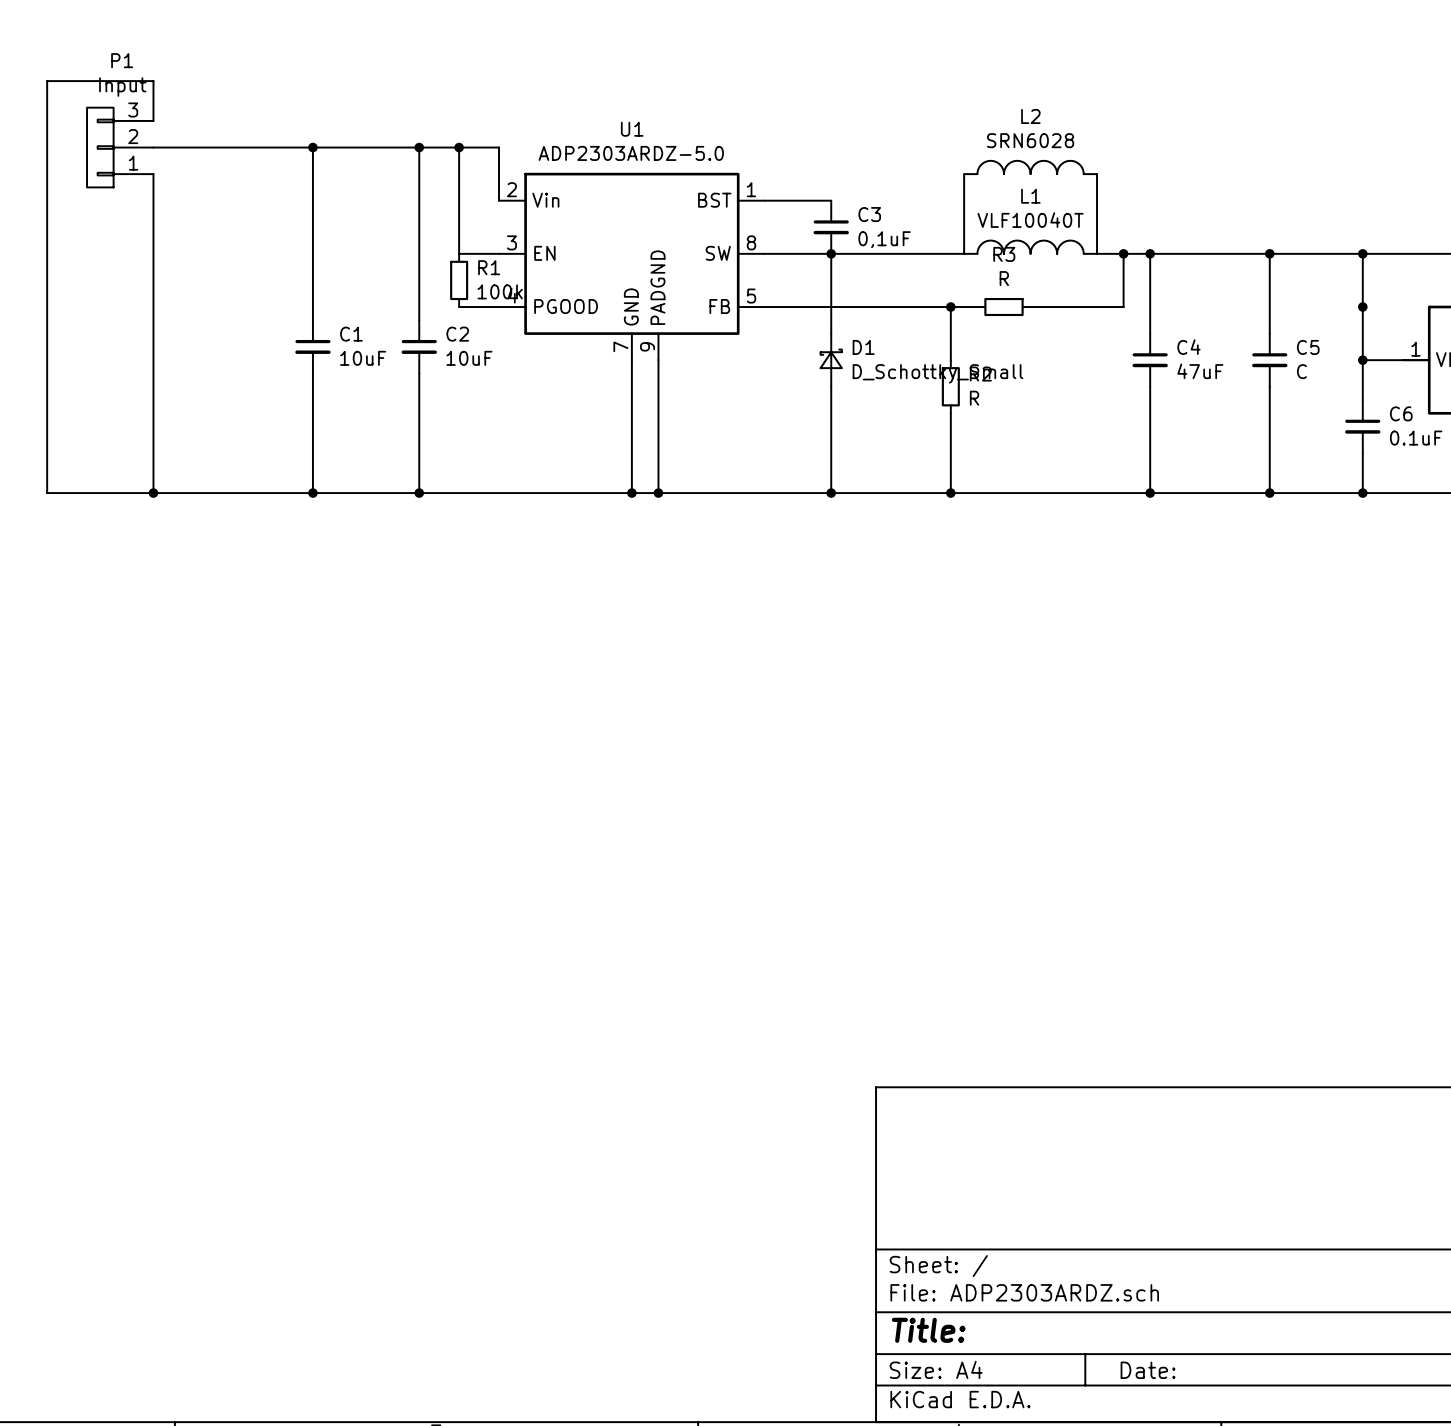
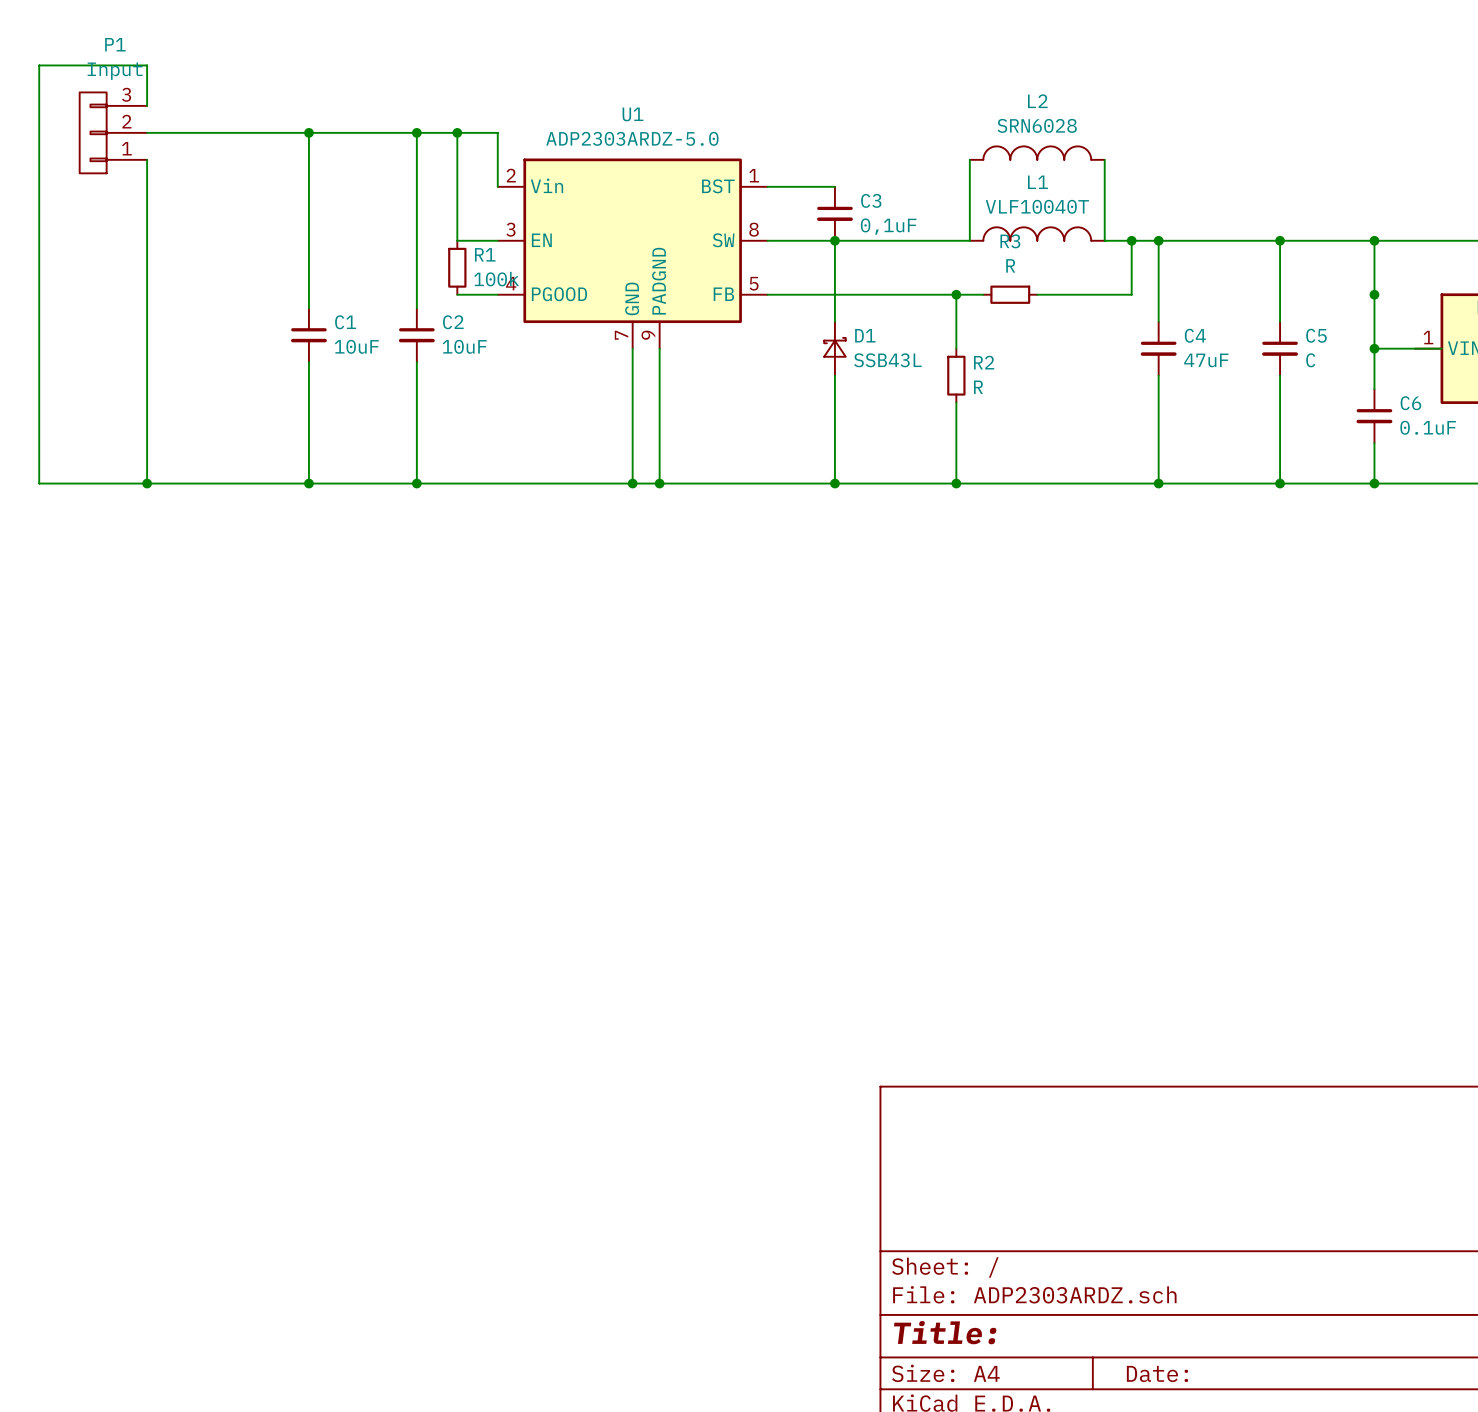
D1 value: D_Schottky_Small (938, 373) -> SSB43L (887, 360)

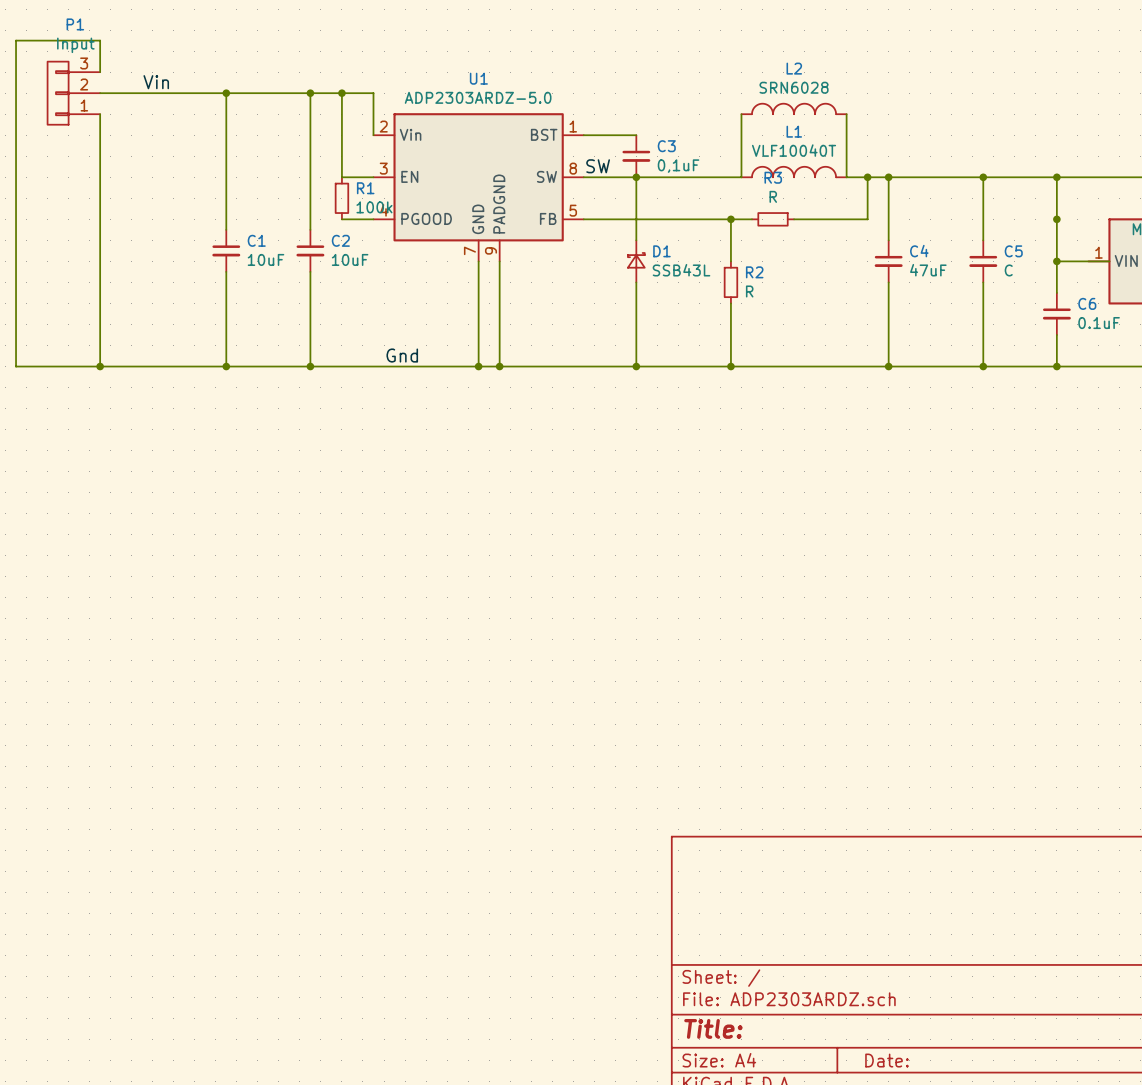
label: none -> Vin (156, 82)
label: none -> SW (598, 166)
label: none -> Gnd (402, 355)

